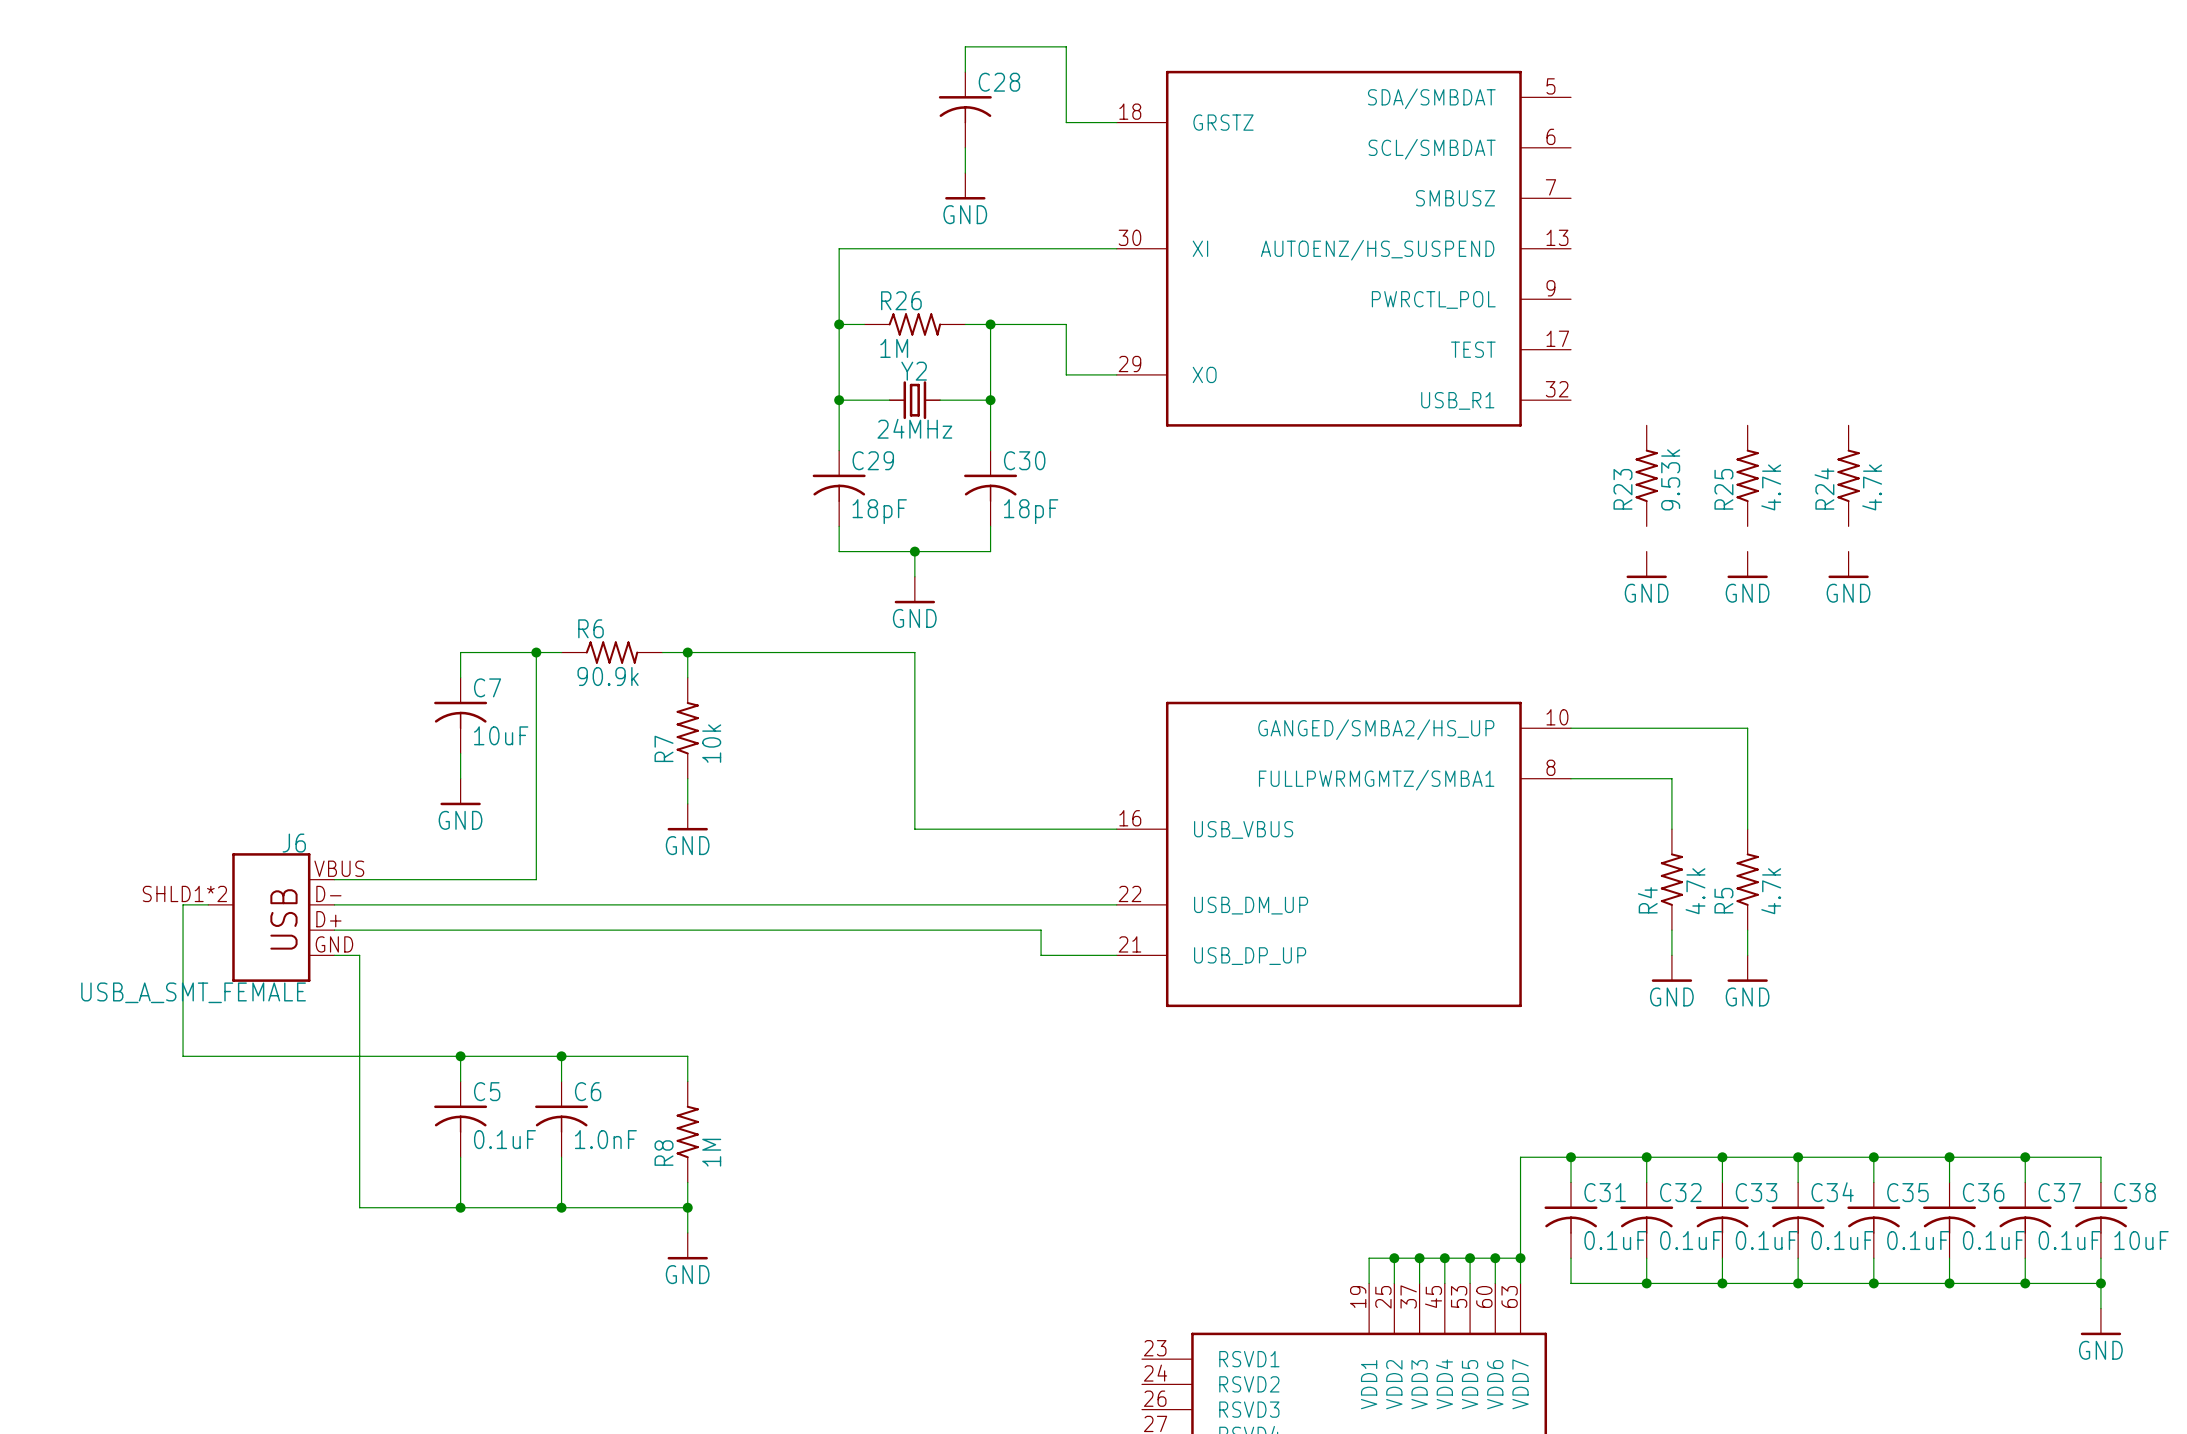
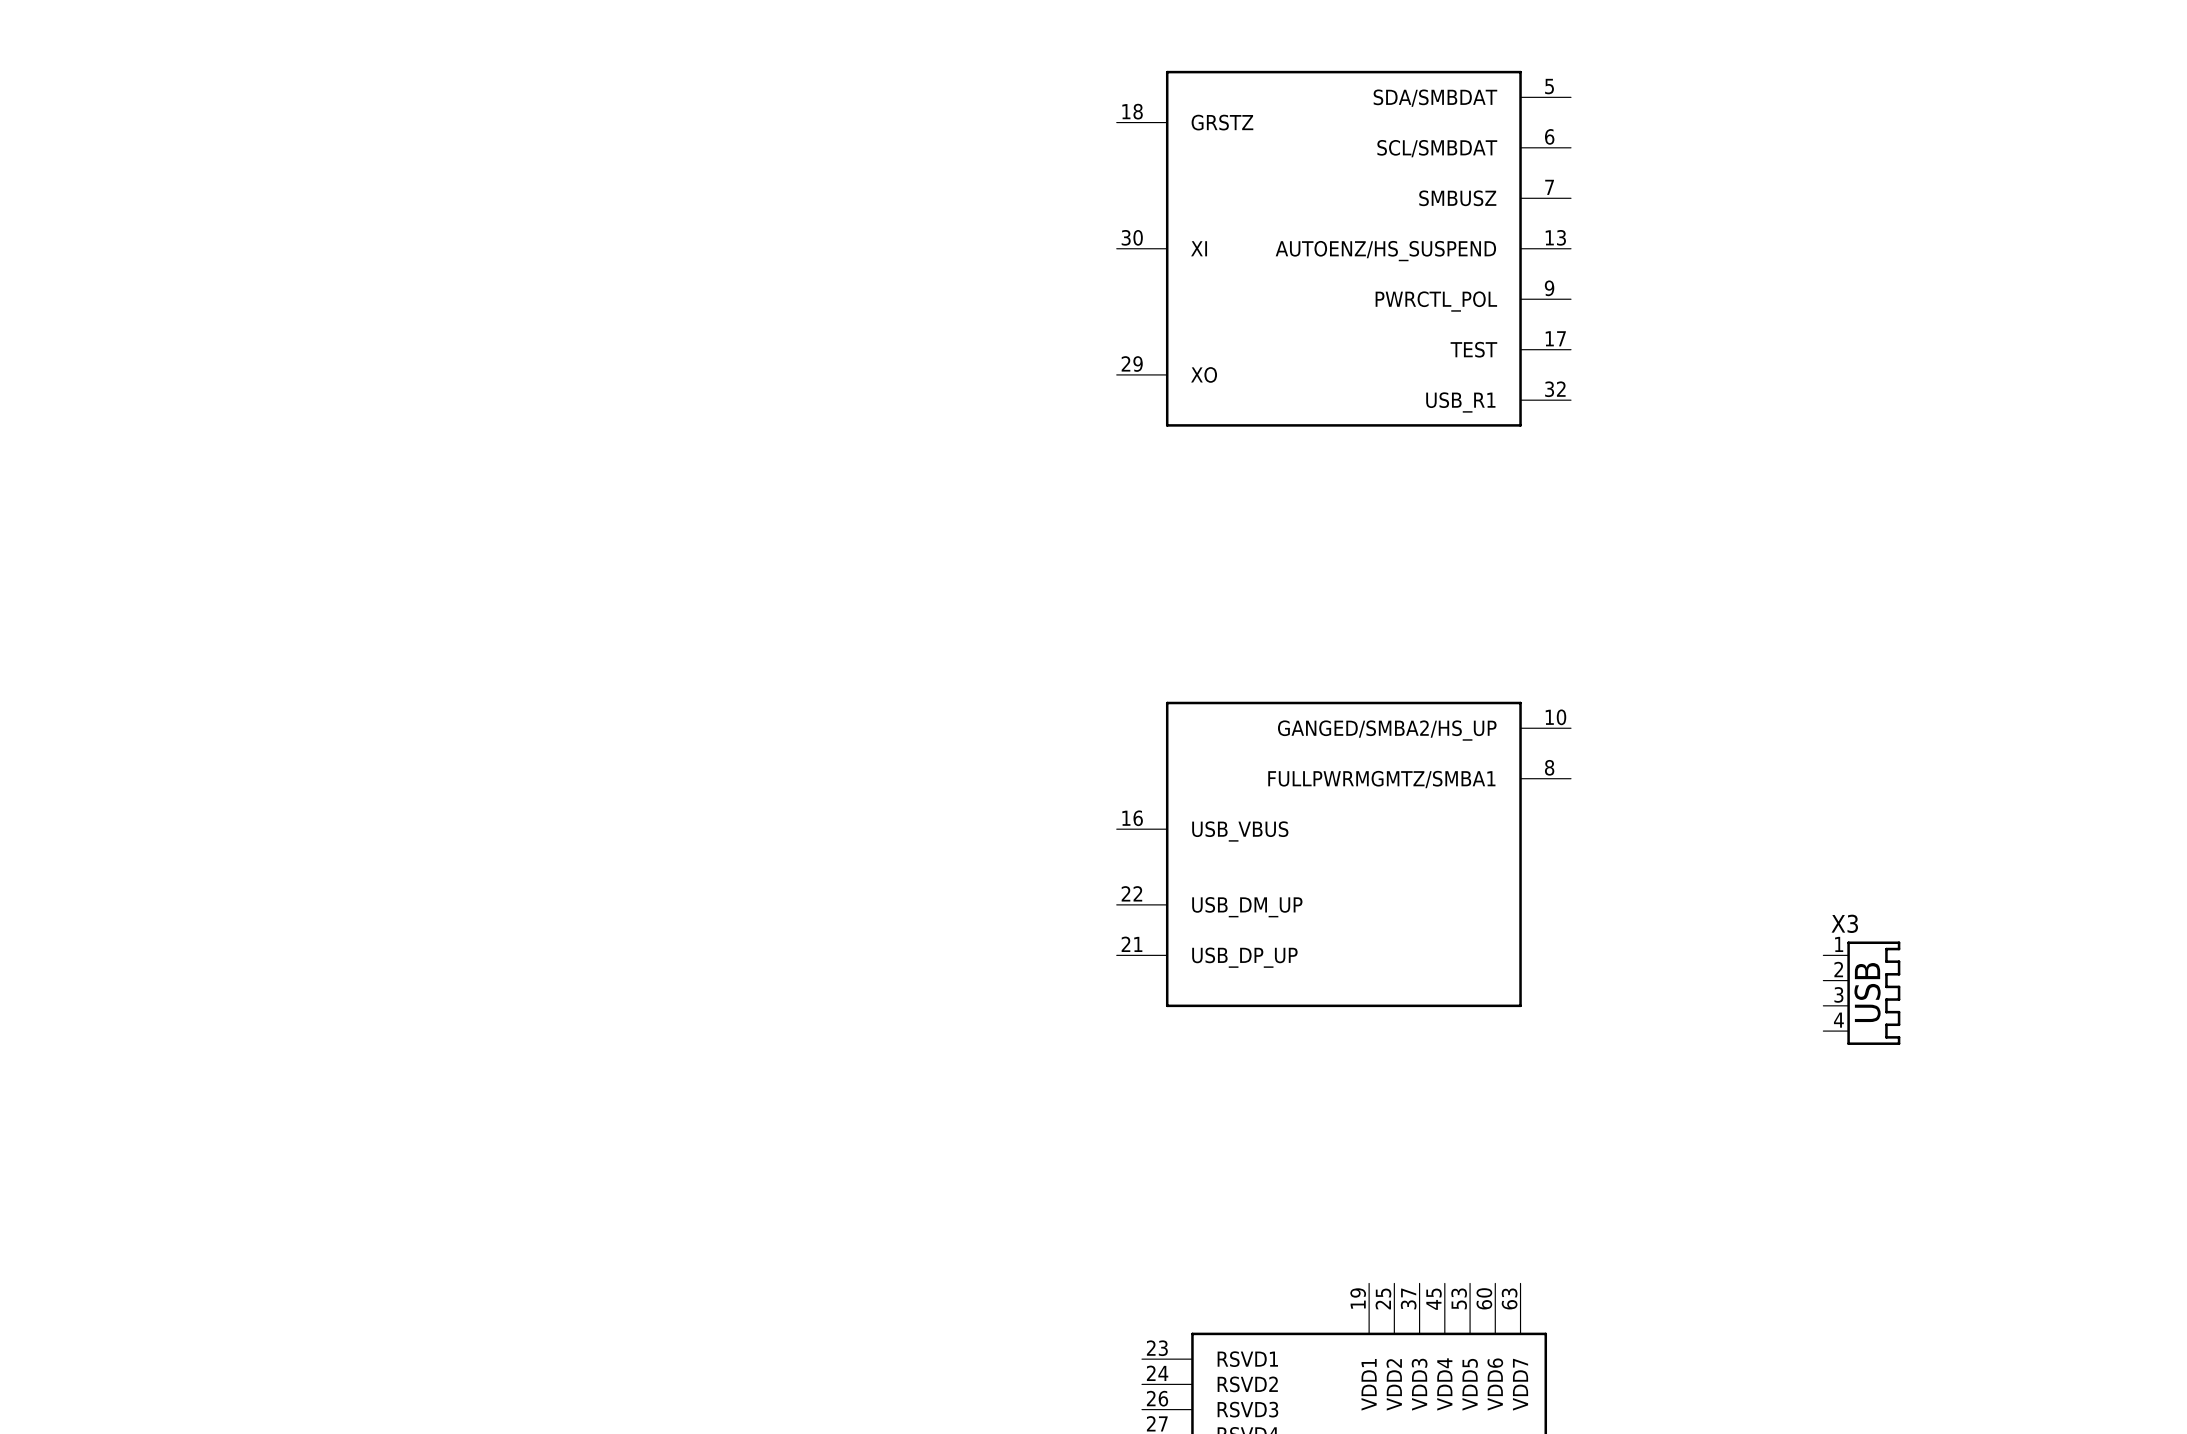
wire: (965, 72) (965, 46) (1066, 46) (1066, 122) (1116, 122) -> none
C28: (965, 109) -> none
wire: (965, 147) (965, 173) -> none
power symbol: GND (965, 186) -> none
wire: (1116, 248) (839, 248) (839, 450) -> none
wire: (839, 324) (864, 324) -> none
junction: (839, 324) -> none
R26: 1M (914, 324) -> none
wire: (965, 324) (1066, 324) (1066, 374) (1116, 374) -> none
wire: (990, 324) (990, 450) -> none
junction: (990, 324) -> none
wire: (839, 400) (889, 400) -> none
junction: (839, 400) -> none
Y2: 24MHz (914, 400) -> none
wire: (940, 400) (990, 400) -> none
junction: (990, 400) -> none
R23: 9.53k (1646, 475) -> none
R25: 4.7k (1747, 475) -> none
R24: 4.7k (1848, 475) -> none
C29: 18pF (839, 488) -> none
C30: 18pF (990, 488) -> none
wire: (839, 526) (839, 551) (990, 551) (990, 526) -> none
wire: (914, 551) (914, 576) -> none
junction: (914, 551) -> none
power symbol: GND (1646, 564) -> none
power symbol: GND (1747, 564) -> none
power symbol: GND (1848, 564) -> none
power symbol: GND (914, 590) -> none
wire: (536, 652) (536, 879) (334, 879) -> none
junction: (536, 652) -> none
wire: (561, 652) (460, 652) (460, 677) -> none
R6: 90.9k (612, 652) -> none
wire: (662, 652) (914, 652) (914, 829) (1116, 829) -> none
wire: (687, 652) (687, 677) -> none
junction: (687, 652) -> none
C7: 10uF (460, 715) -> none
R7: 10k (687, 728) -> none
wire: (1571, 728) (1747, 728) (1747, 829) -> none
wire: (460, 753) (460, 778) -> none
wire: (687, 778) (687, 803) -> none
wire: (1571, 778) (1671, 778) (1671, 829) -> none
power symbol: GND (460, 791) -> none
power symbol: GND (687, 817) -> none
R4: 4.7k (1671, 879) -> none
R5: 4.7k (1747, 879) -> none
wire: (208, 904) (183, 904) (183, 1056) (687, 1056) (687, 1081) -> none
wire: (334, 904) (1116, 904) -> none
J6: USB_A_SMT_FEMALE (271, 917) -> none
wire: (334, 930) (1041, 930) (1041, 955) (1116, 955) -> none
wire: (1671, 930) (1671, 955) -> none
wire: (1747, 930) (1747, 955) -> none
wire: (334, 955) (359, 955) (359, 1207) (687, 1207) -> none
power symbol: GND (1671, 968) -> none
power symbol: GND (1747, 968) -> none
X3: none -> (1861, 993)
wire: (460, 1056) (460, 1081) -> none
junction: (460, 1056) -> none
wire: (561, 1056) (561, 1081) -> none
junction: (561, 1056) -> none
C5: 0.1uF (460, 1119) -> none
C6: 1.0nF (561, 1119) -> none
R8: 1M (687, 1132) -> none
wire: (460, 1157) (460, 1207) -> none
wire: (561, 1157) (561, 1207) -> none
wire: (1571, 1157) (1571, 1182) -> none
junction: (1571, 1157) -> none
wire: (1646, 1157) (1646, 1182) -> none
junction: (1646, 1157) -> none
wire: (1722, 1157) (1722, 1182) -> none
junction: (1722, 1157) -> none
wire: (1798, 1157) (1798, 1182) -> none
junction: (1798, 1157) -> none
wire: (1873, 1157) (1873, 1182) -> none
junction: (1873, 1157) -> none
wire: (1949, 1157) (1949, 1182) -> none
junction: (1949, 1157) -> none
wire: (2025, 1157) (2025, 1182) -> none
junction: (2025, 1157) -> none
wire: (687, 1182) (687, 1232) -> none
wire: (2100, 1182) (2100, 1157) (1520, 1157) (1520, 1283) -> none
junction: (460, 1207) -> none
junction: (561, 1207) -> none
junction: (687, 1207) -> none
C31: 0.1uF (1571, 1220) -> none
C32: 0.1uF (1646, 1220) -> none
C33: 0.1uF (1722, 1220) -> none
C34: 0.1uF (1798, 1220) -> none
C35: 0.1uF (1873, 1220) -> none
C36: 0.1uF (1949, 1220) -> none
C37: 0.1uF (2025, 1220) -> none
C38: 10uF (2100, 1220) -> none
power symbol: GND (687, 1246) -> none
wire: (1394, 1258) (1394, 1283) -> none
junction: (1394, 1258) -> none
wire: (1419, 1258) (1419, 1283) -> none
junction: (1419, 1258) -> none
wire: (1444, 1258) (1444, 1283) -> none
junction: (1444, 1258) -> none
wire: (1470, 1258) (1470, 1283) -> none
junction: (1470, 1258) -> none
wire: (1495, 1258) (1495, 1283) -> none
junction: (1495, 1258) -> none
wire: (1520, 1258) (1369, 1258) (1369, 1283) -> none
junction: (1520, 1258) -> none
wire: (1571, 1258) (1571, 1283) (2100, 1283) -> none
wire: (1646, 1258) (1646, 1283) -> none
wire: (1722, 1258) (1722, 1283) -> none
wire: (1798, 1258) (1798, 1283) -> none
wire: (1873, 1258) (1873, 1283) -> none
wire: (1949, 1258) (1949, 1283) -> none
wire: (2025, 1258) (2025, 1283) -> none
wire: (2100, 1258) (2100, 1308) -> none
junction: (1646, 1283) -> none
junction: (1722, 1283) -> none
junction: (1798, 1283) -> none
junction: (1873, 1283) -> none
junction: (1949, 1283) -> none
junction: (2025, 1283) -> none
junction: (2100, 1283) -> none
power symbol: GND (2100, 1321) -> none

